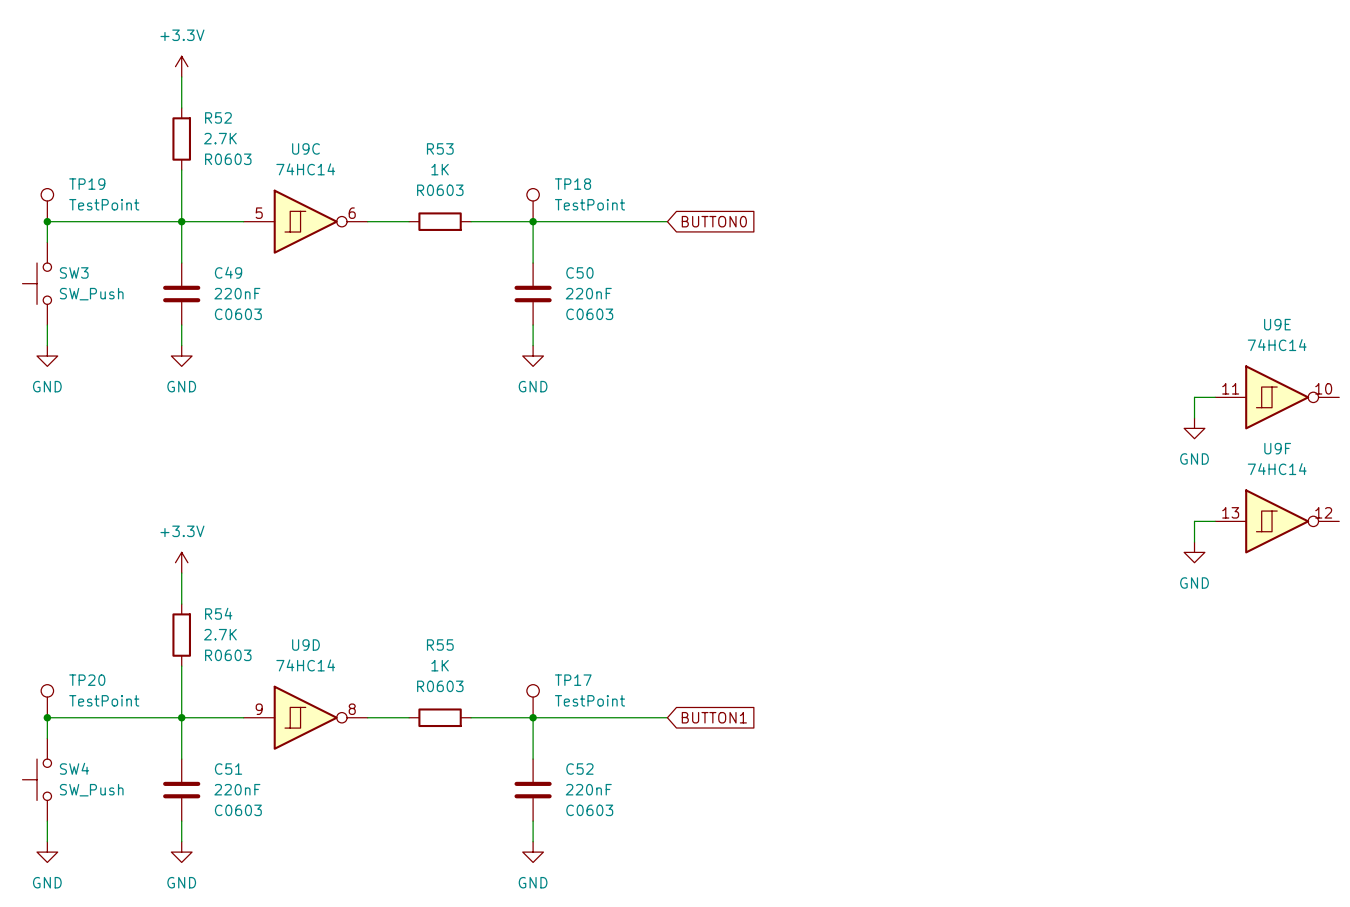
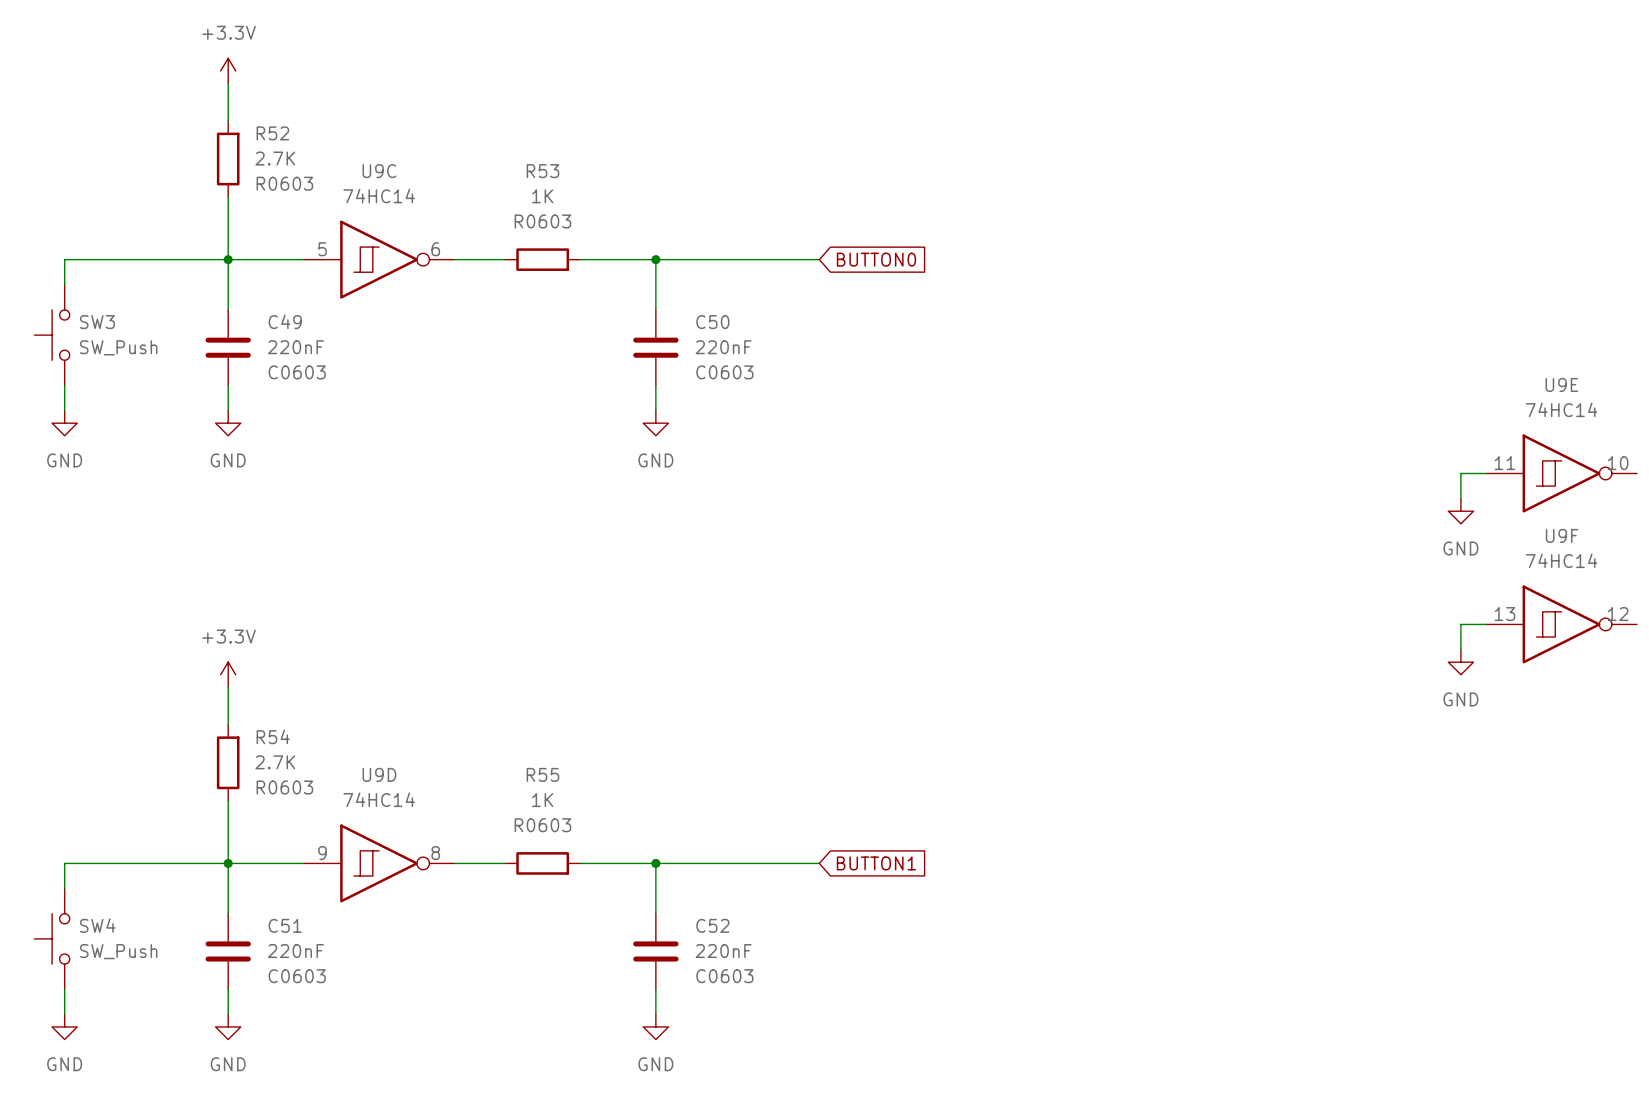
TP19: TestPoint (47, 205) -> none
TP18: TestPoint (533, 205) -> none
junction: (47, 221) -> none
TP20: TestPoint (47, 701) -> none
TP17: TestPoint (533, 701) -> none
junction: (47, 717) -> none

